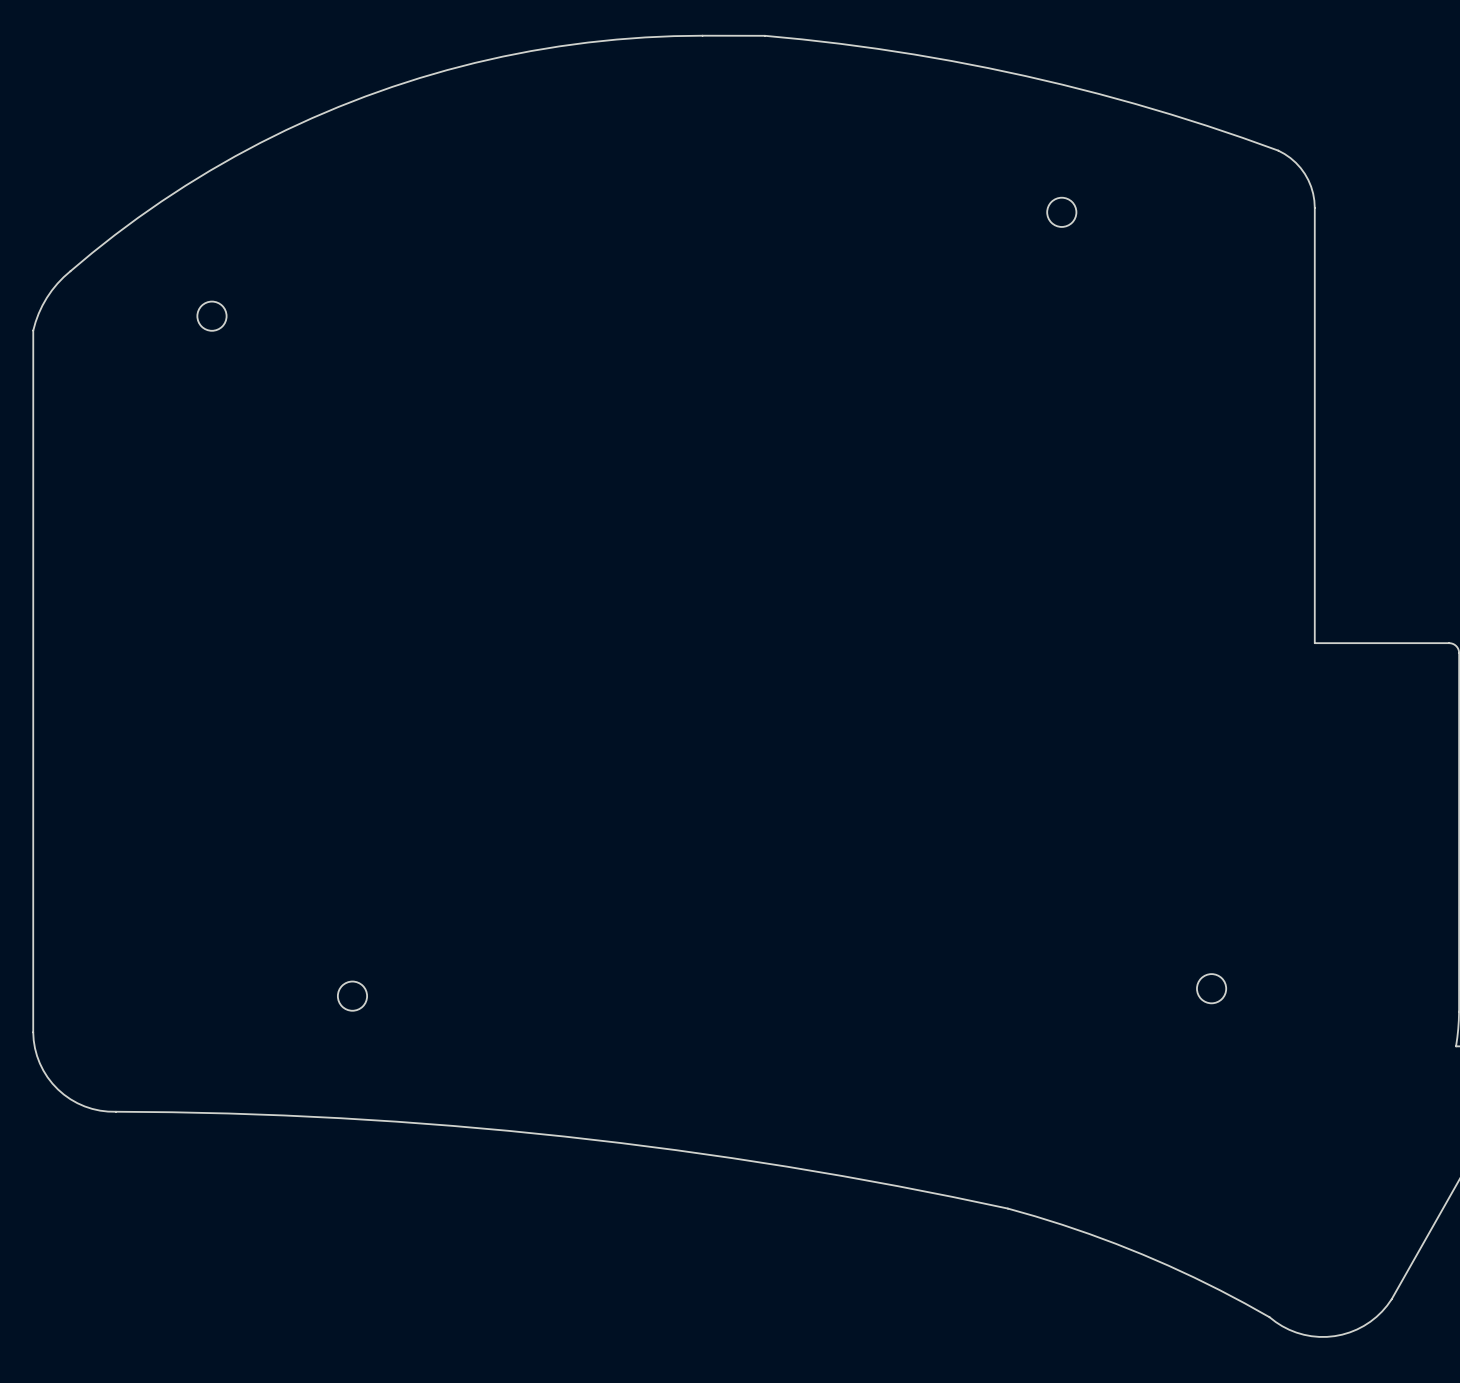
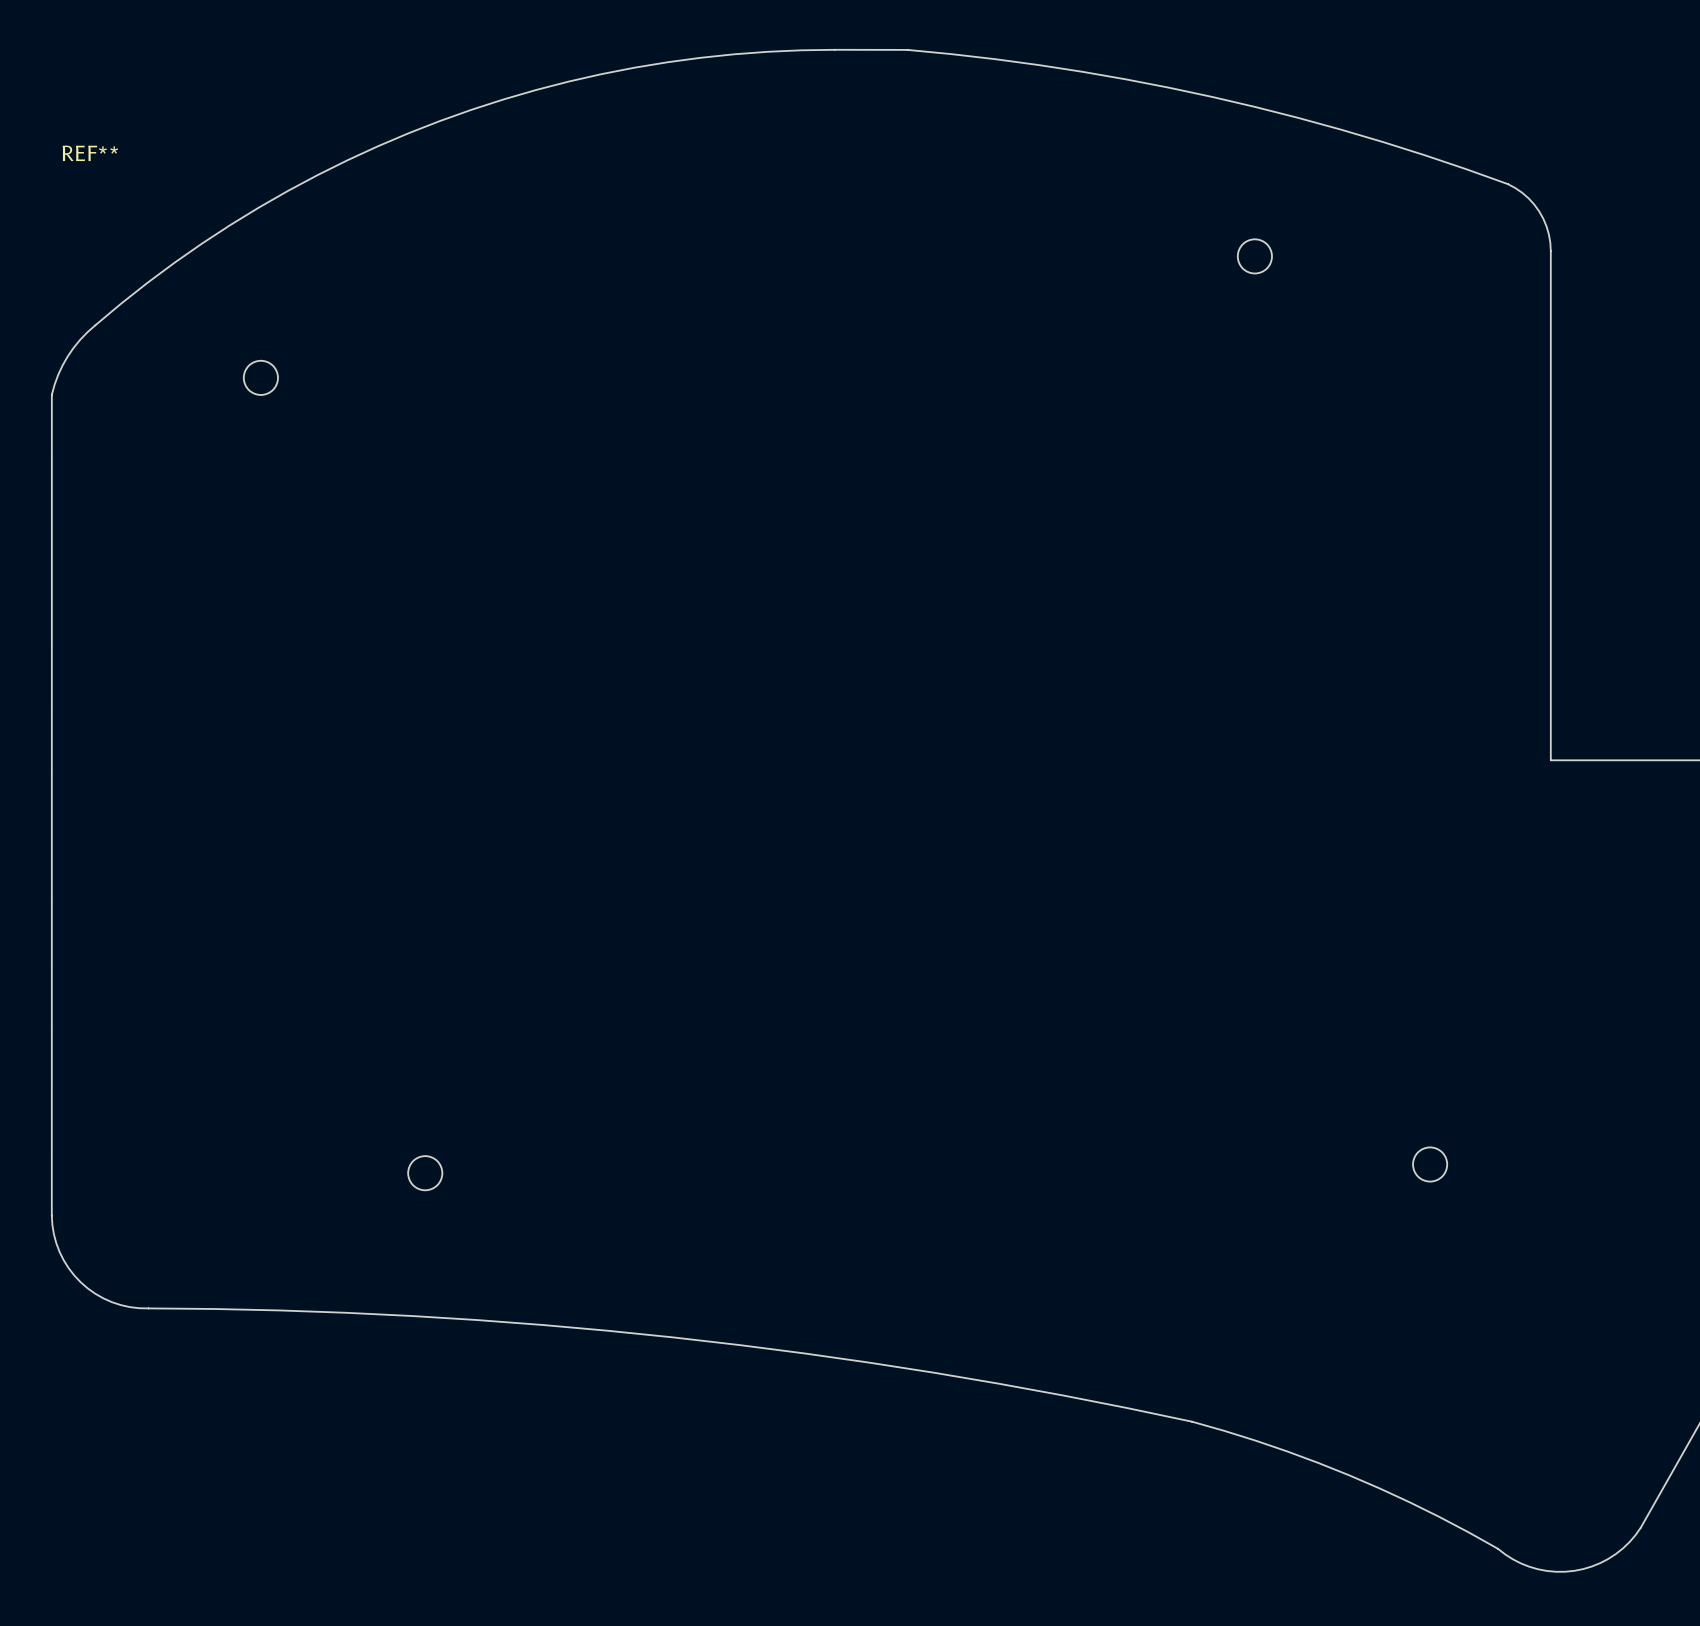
REF**: none -> (90, 153)

